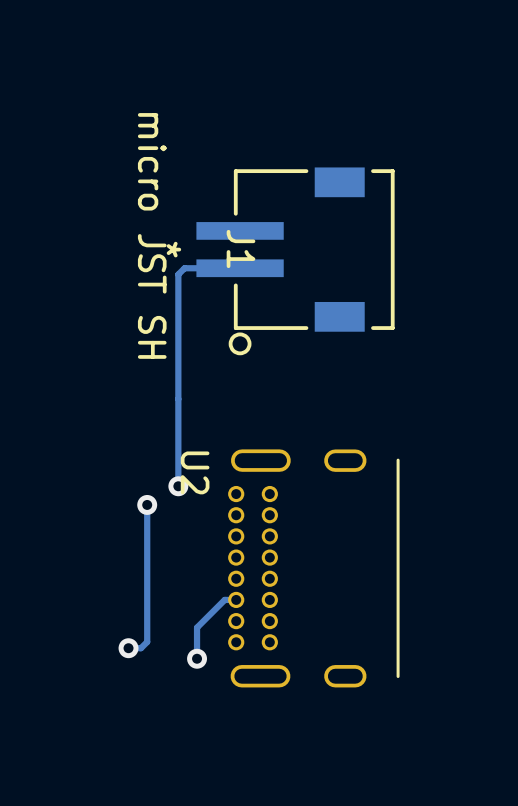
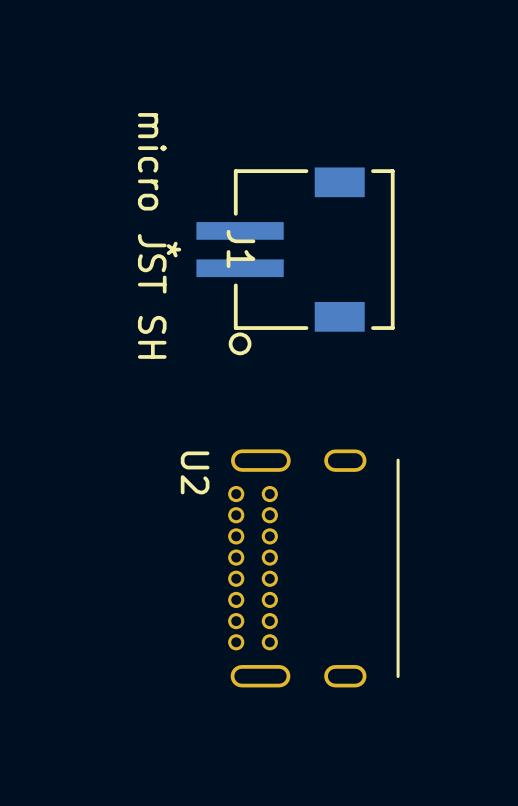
track: (240, 268) (184, 268) (178, 274) (178, 486) -> none
via: (178, 486) -> none
track: (147, 504) (147, 641) (140, 648) (128, 648) -> none
via: (147, 504) -> none
track: (236, 599) (224, 599) (197, 627) (197, 658) -> none
via: (128, 648) -> none
via: (197, 658) -> none

